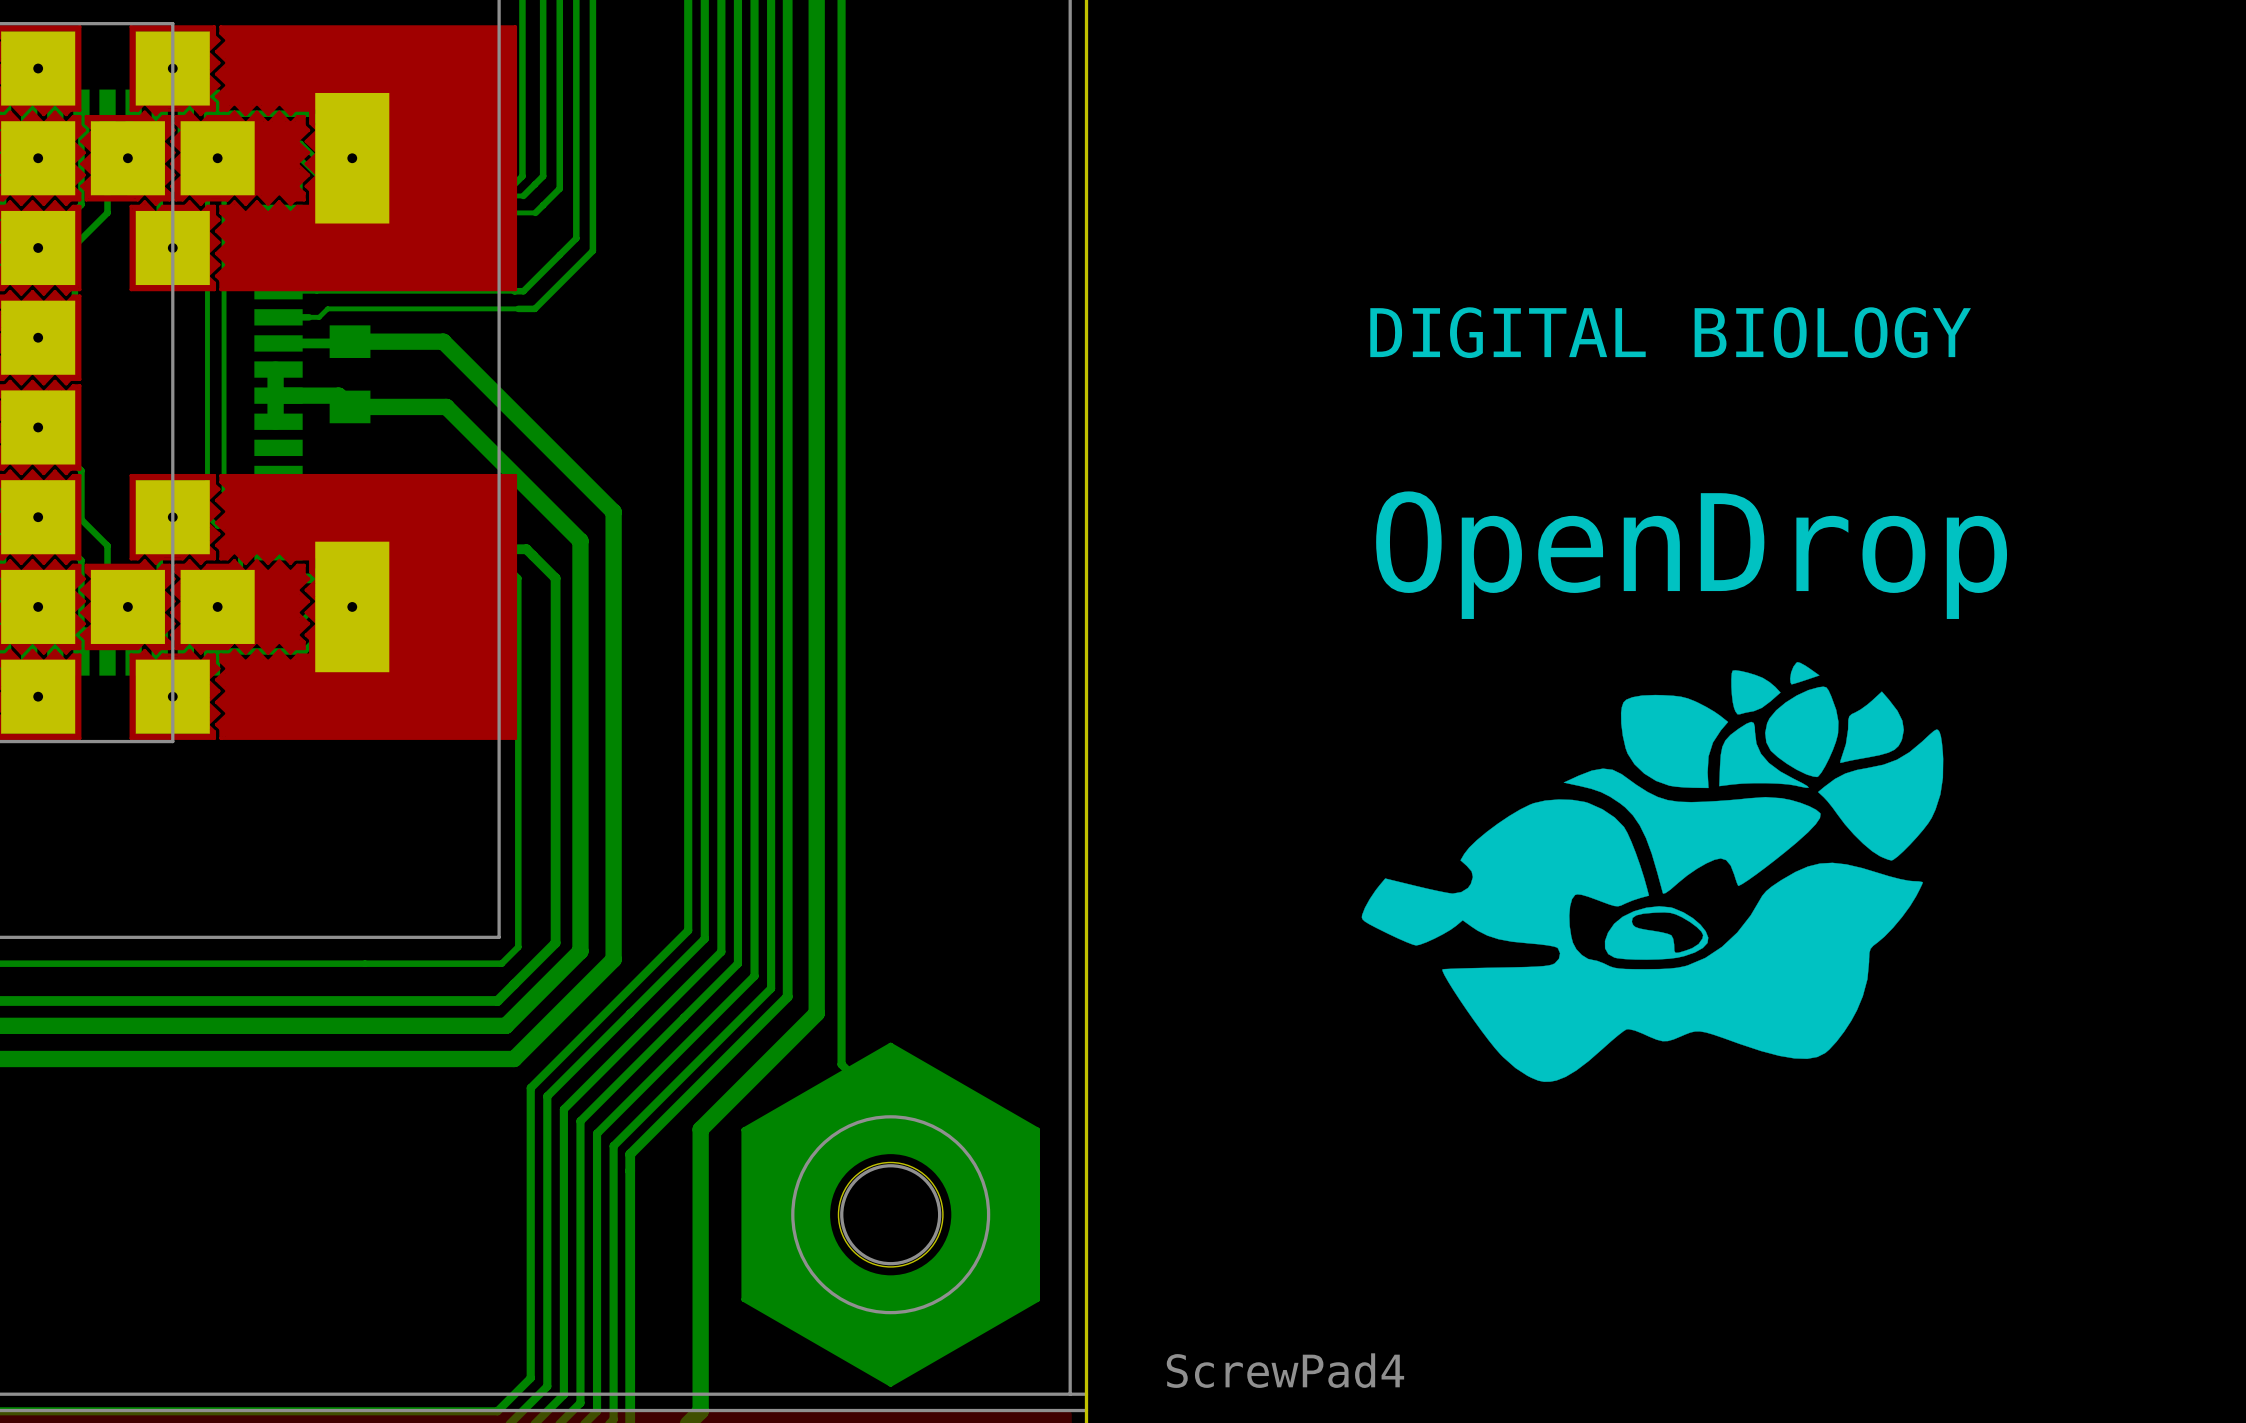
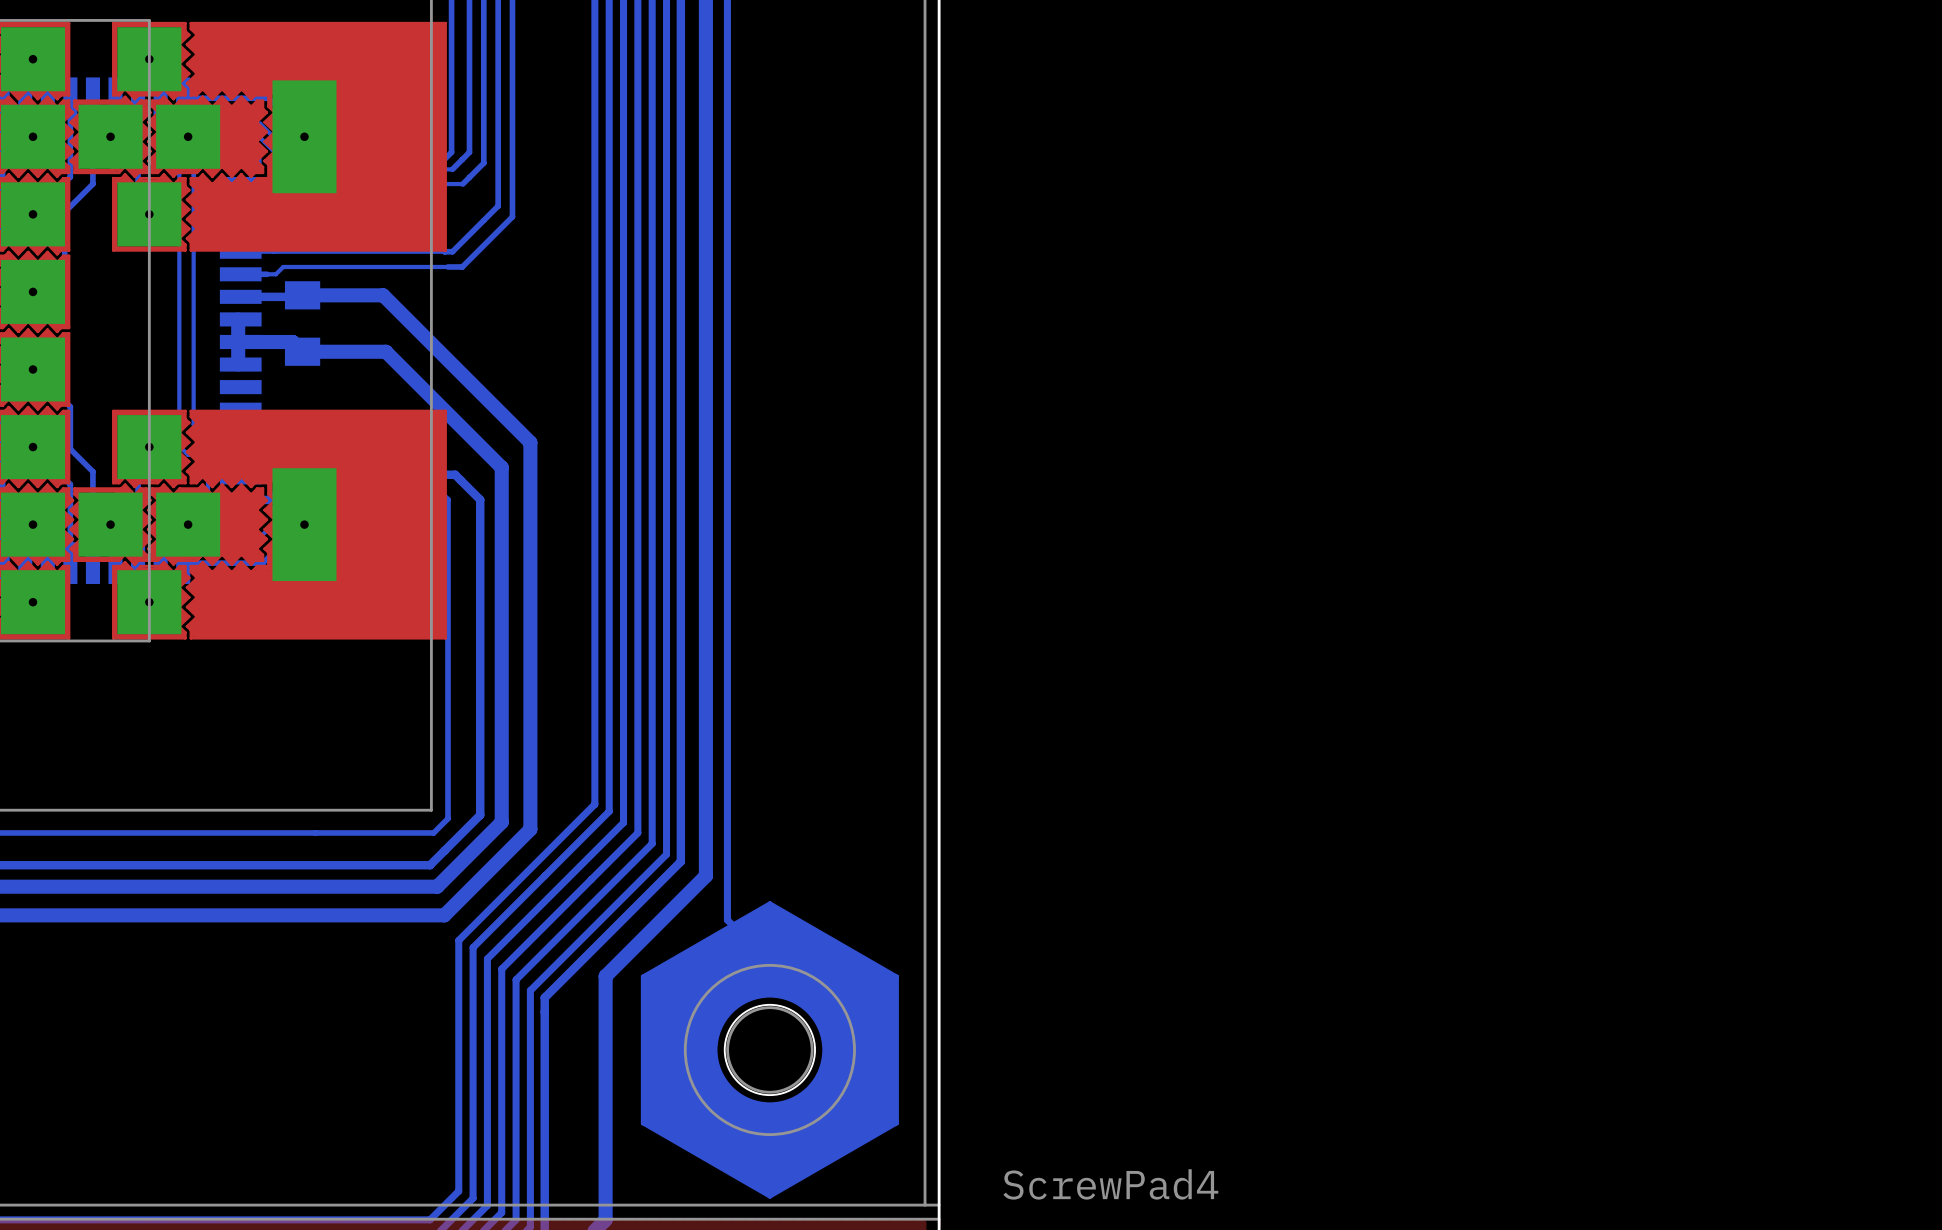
text: DIGITAL BIOLOGY (1670, 332) -> none
text: OpenDrop (1691, 555) -> none
drawing: [1361, 662, 1944, 1082] -> none

